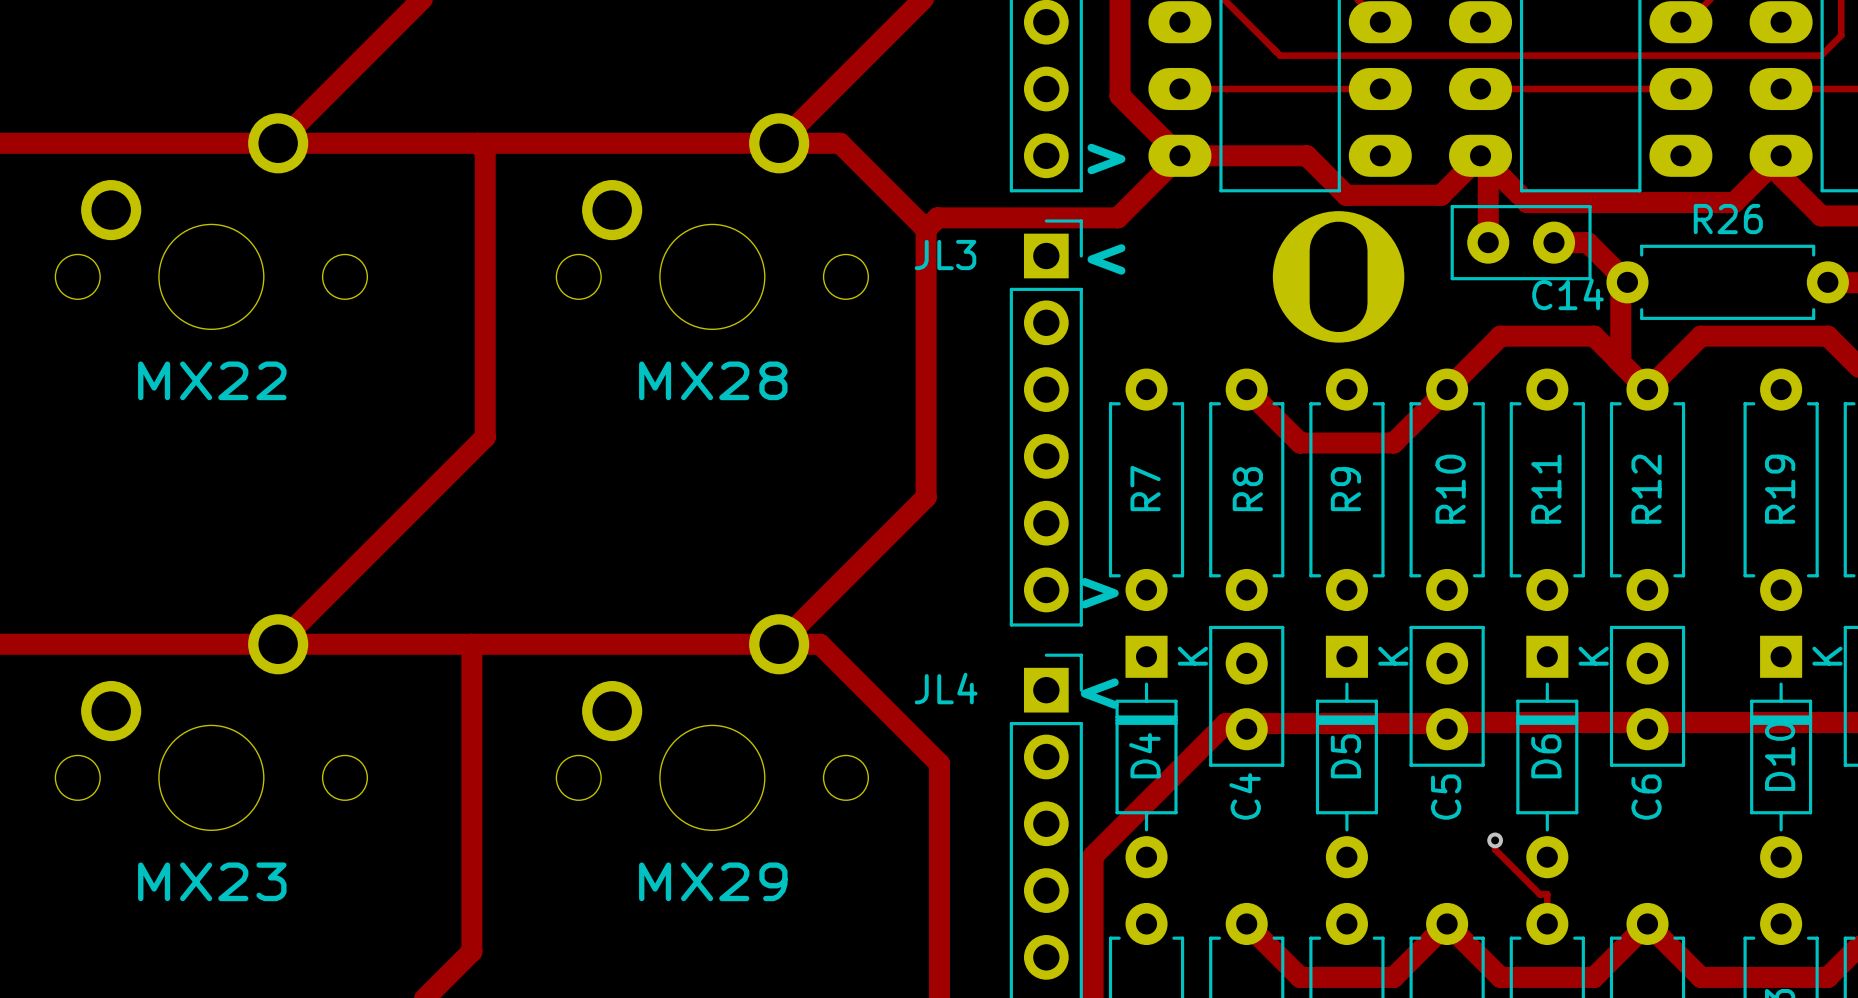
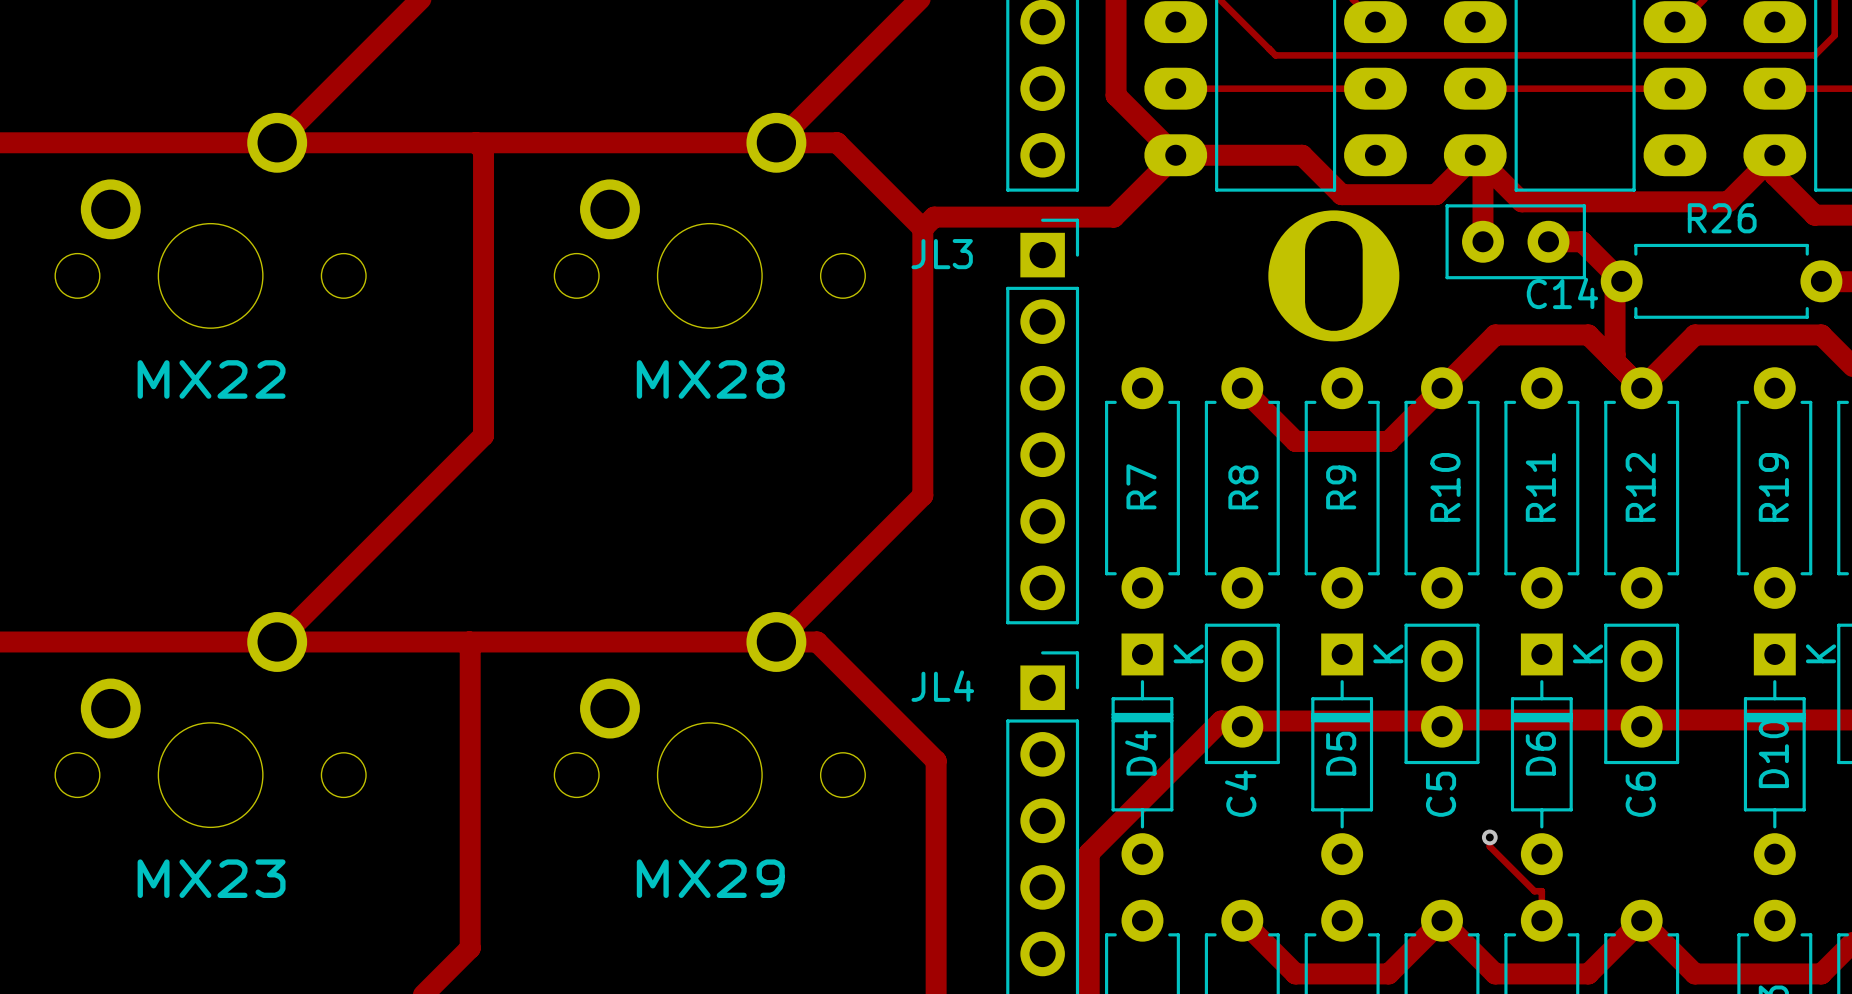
text: > (1106, 159) -> none
text: > (1106, 259) -> none
text: > (1099, 593) -> none
text: > (1099, 693) -> none

